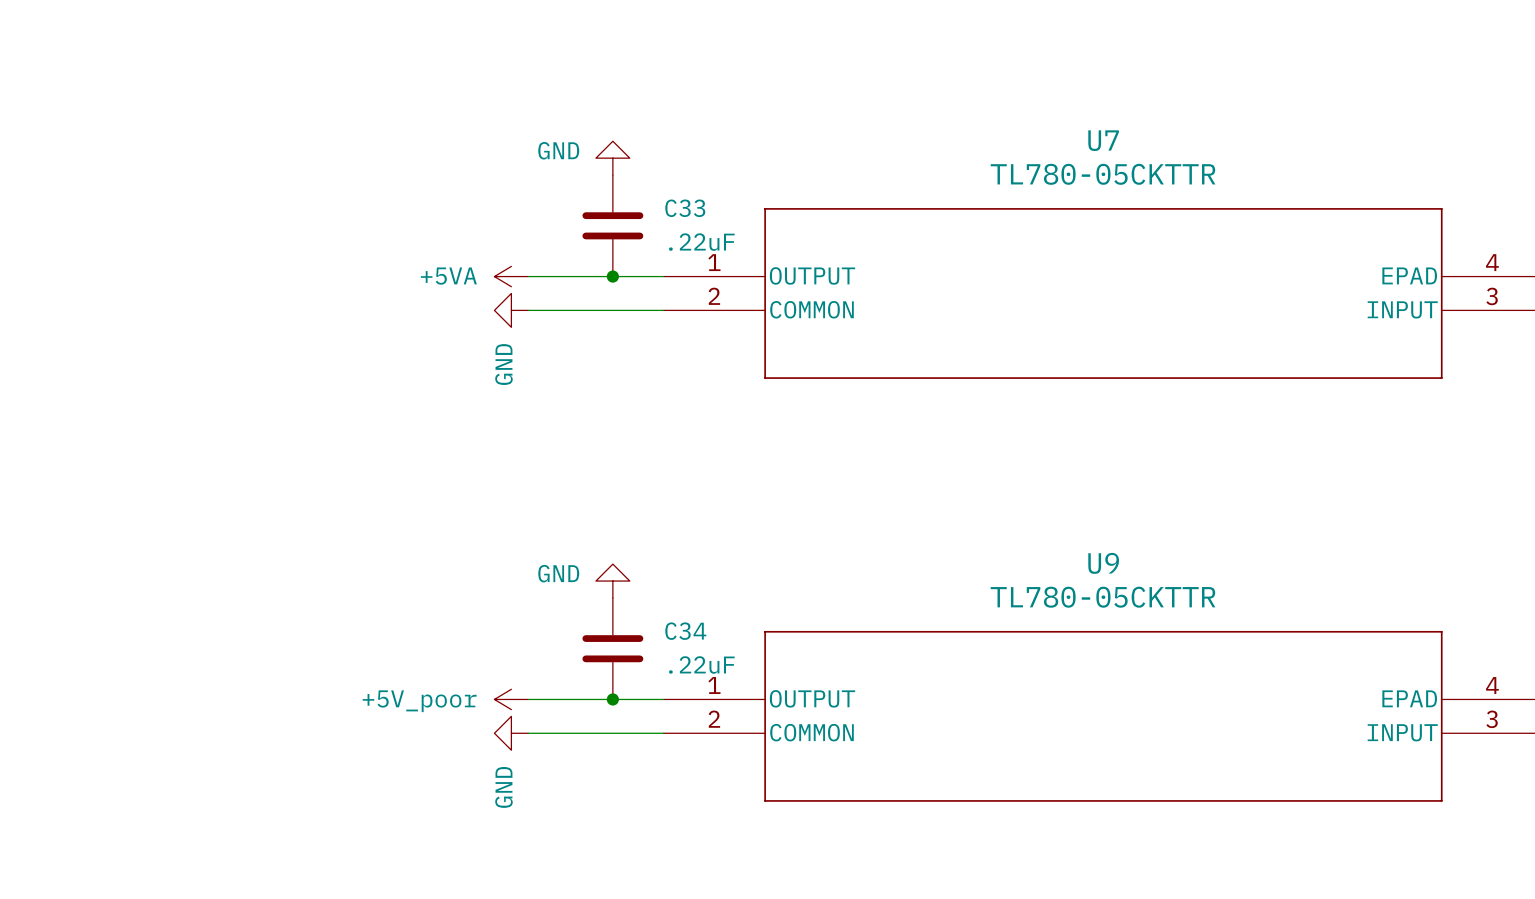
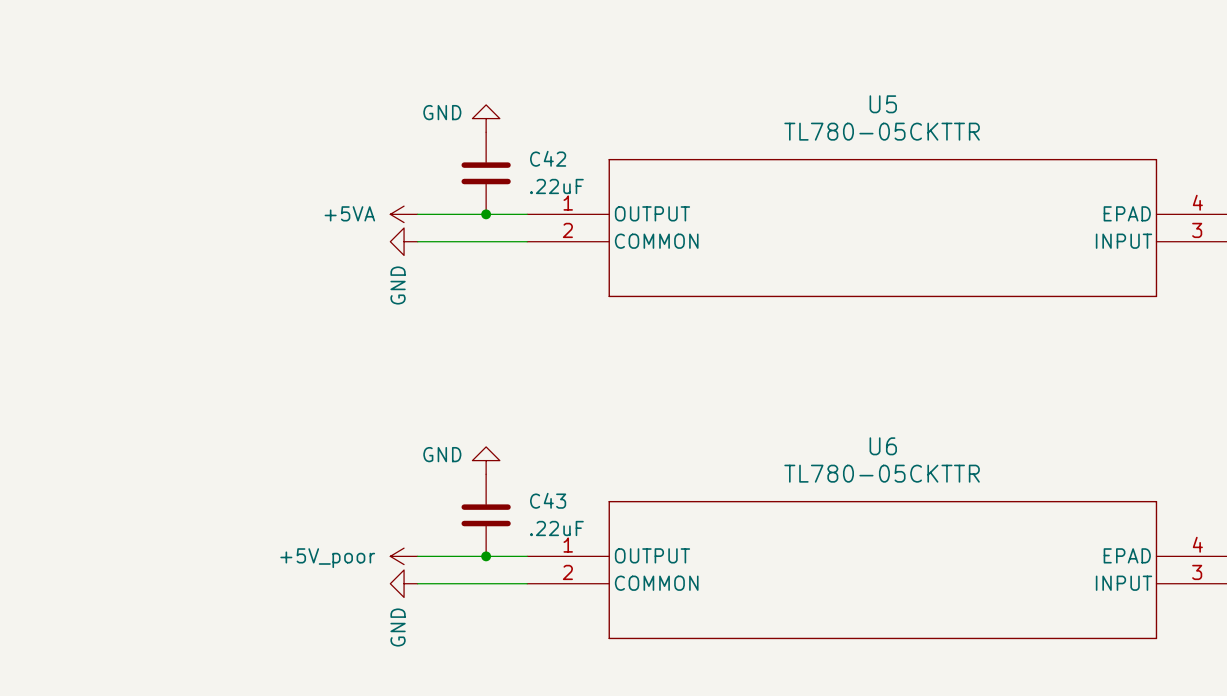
U7 name: U7 (1103, 140) -> U5 (883, 104)
C33 name: C33 (685, 208) -> C42 (548, 158)
U9 name: U9 (1103, 563) -> U6 (883, 446)
C34 name: C34 (685, 631) -> C43 (548, 500)

